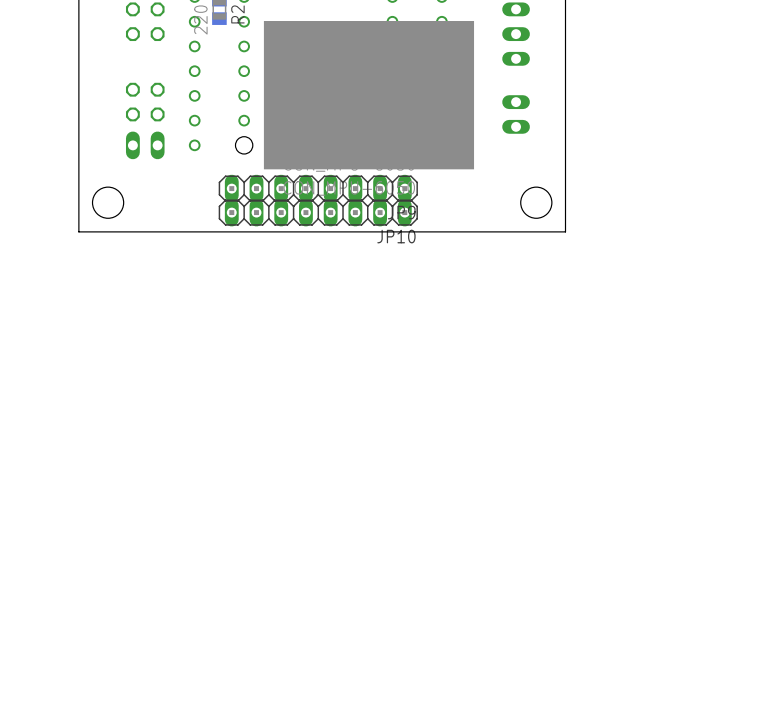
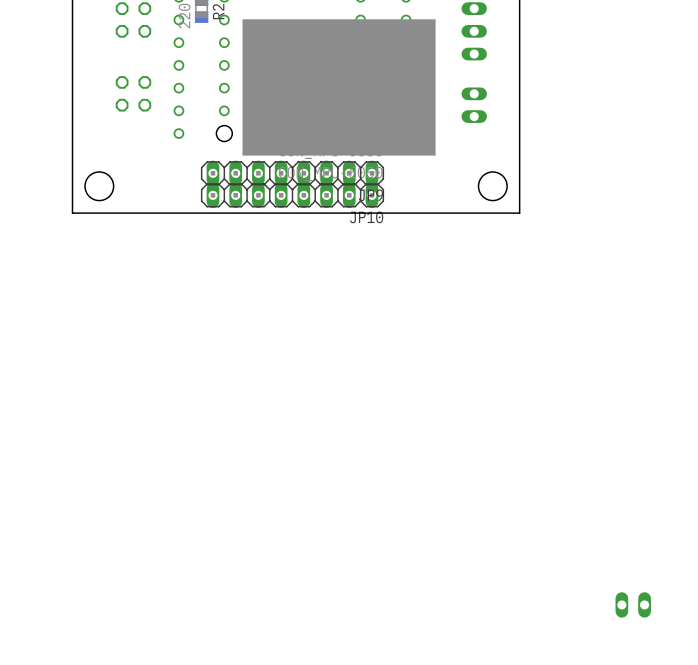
part: (145, 145) -> none
part: none -> (633, 604)

